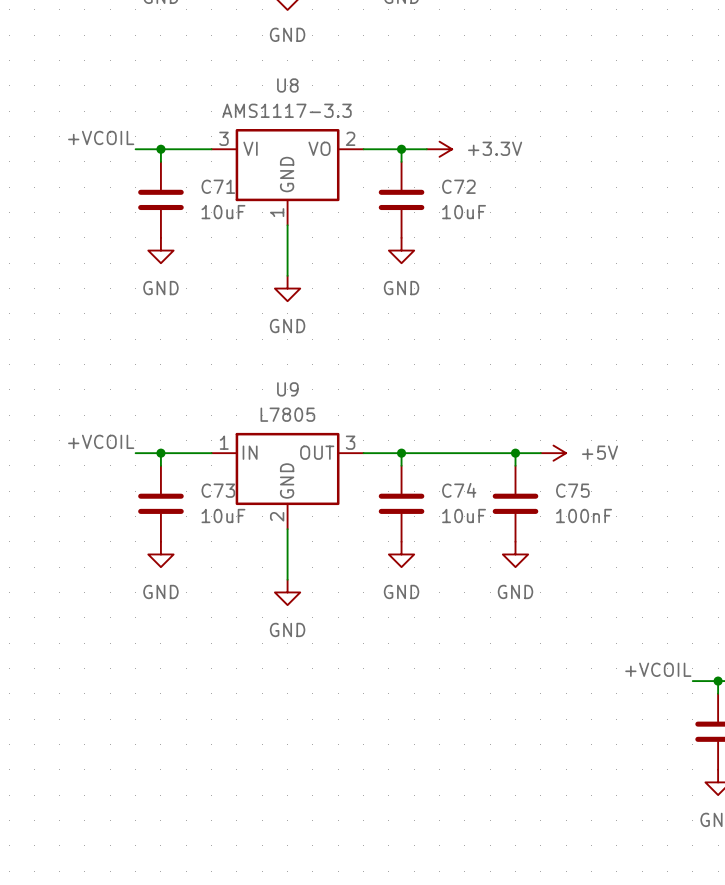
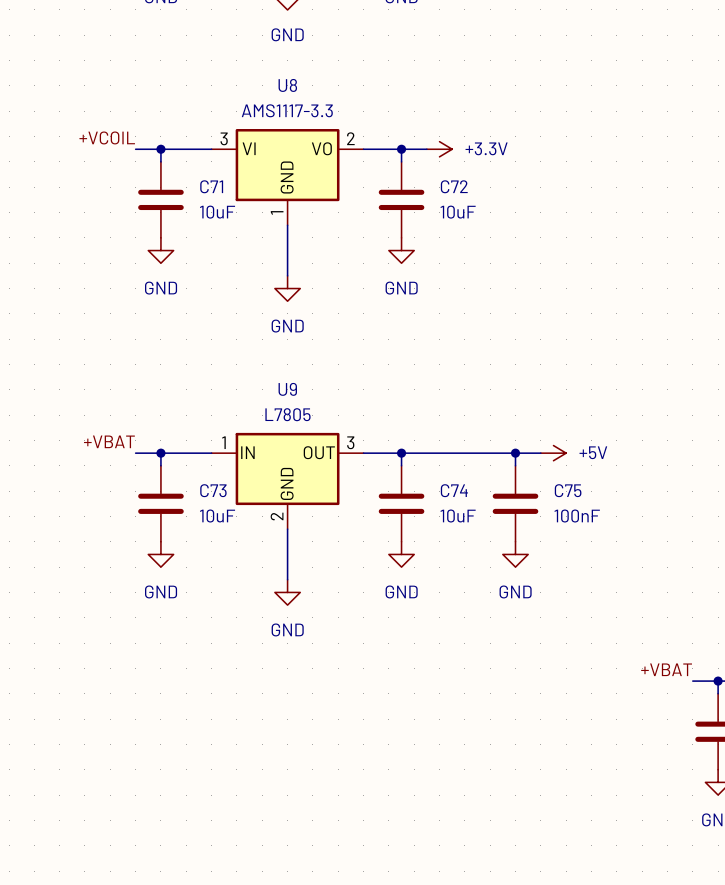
label: +VCOIL (101, 441) -> +VBAT (109, 441)
label: +VCOIL (658, 669) -> +VBAT (666, 669)

